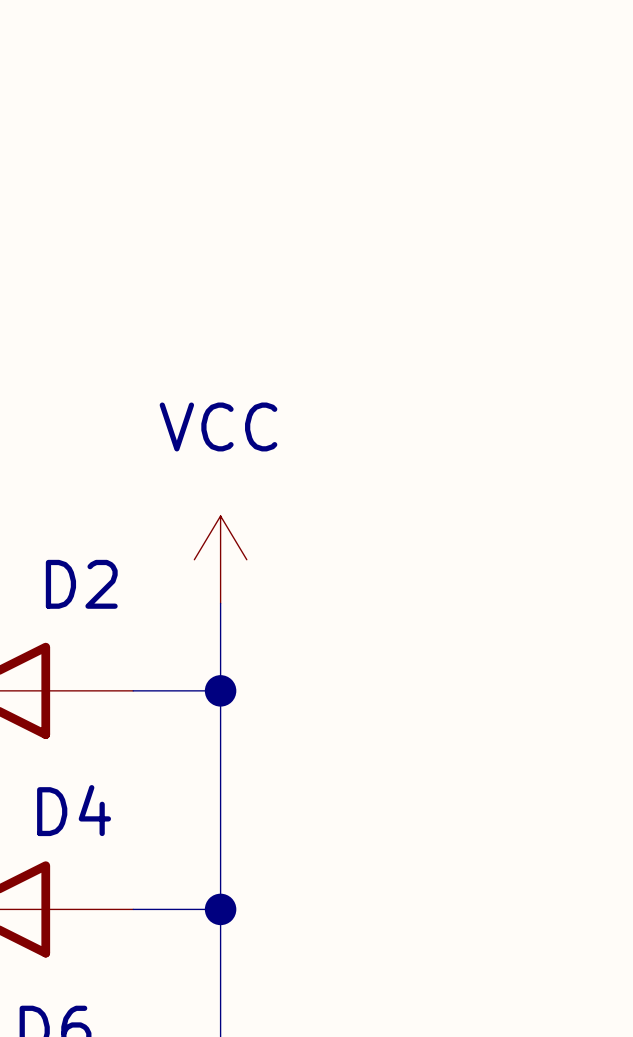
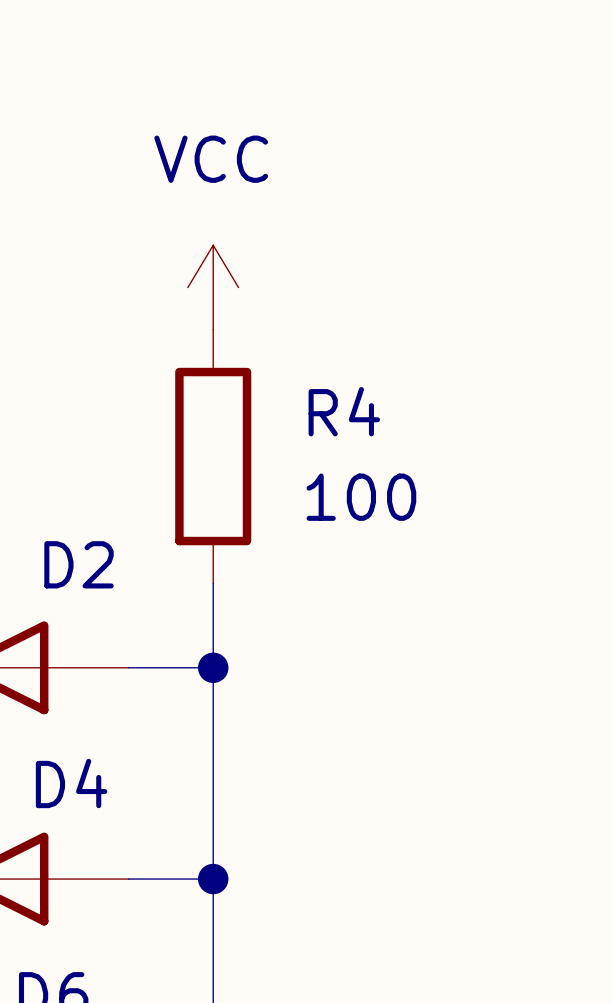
R4: none -> 100 (213, 456)
power symbol position: VCC (220, 559) -> VCC (213, 287)

